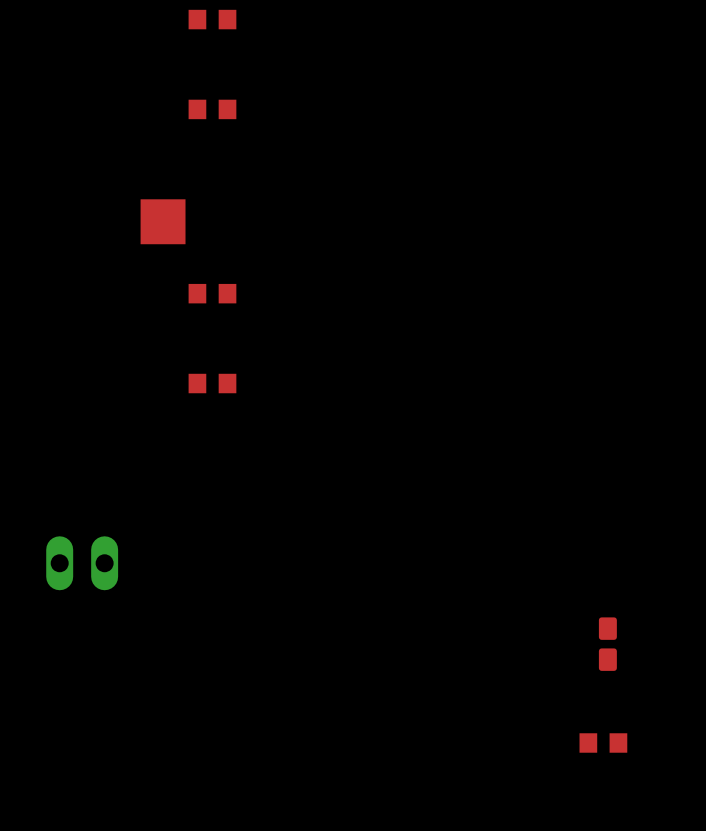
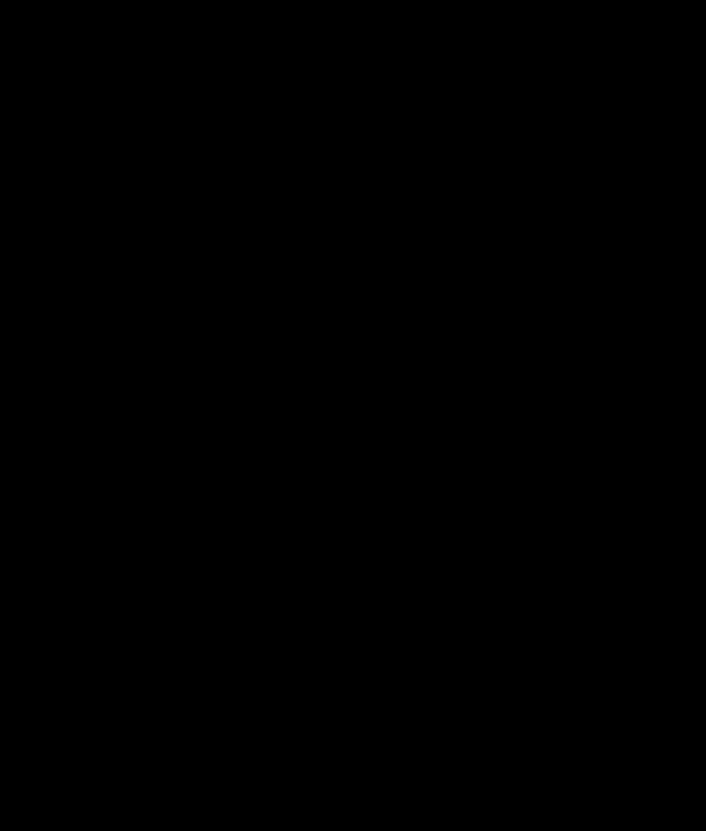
part: (212, 19) -> none
part: (212, 109) -> none
part: (163, 221) -> none
part: (212, 293) -> none
part: (212, 383) -> none
part: (82, 563) -> none
part: (607, 644) -> none
part: (603, 742) -> none

